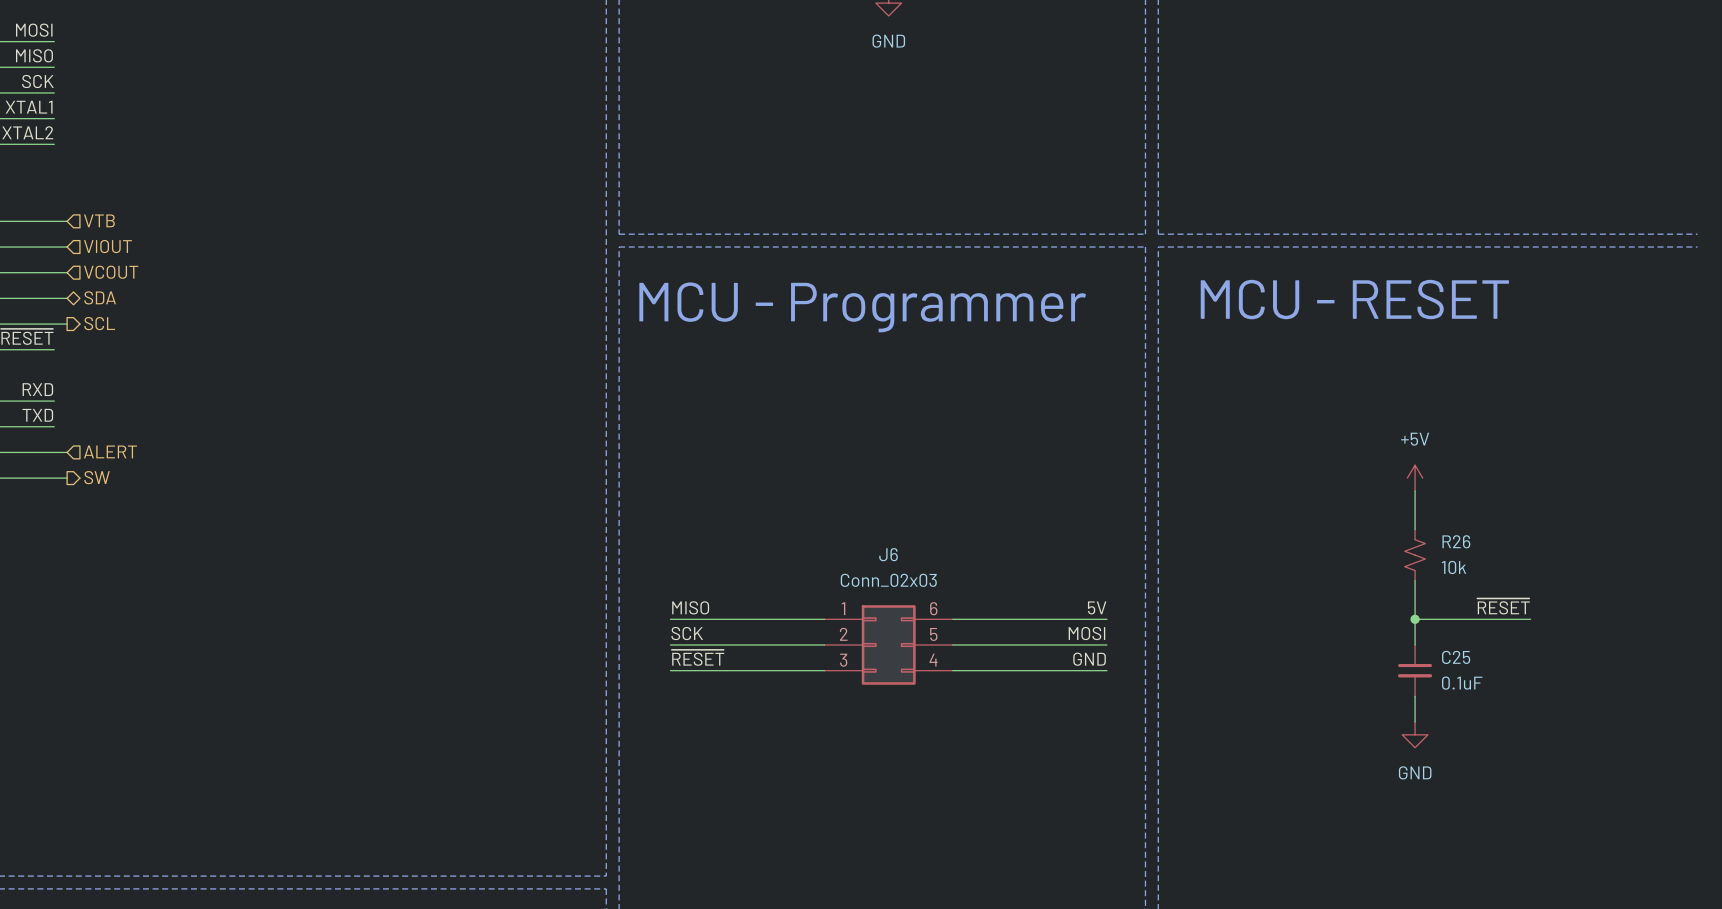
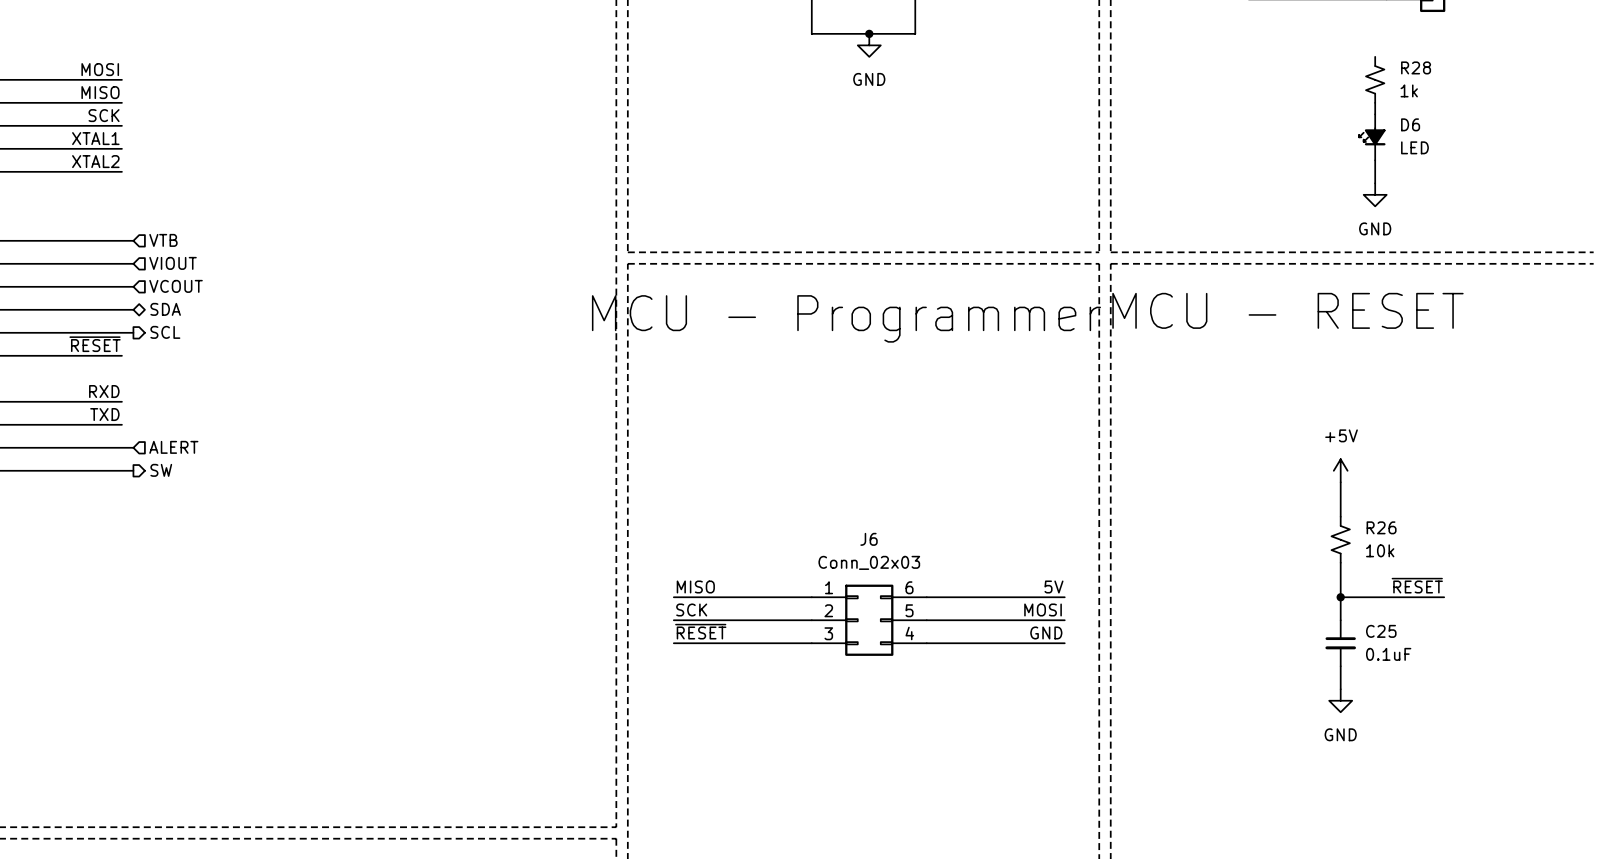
R28: none -> 1k (1375, 79)
wire: none -> (1375, 102) (1375, 114)
D6: none -> LED (1372, 137)
wire: none -> (1375, 160) (1375, 183)
power symbol: none -> GND (1375, 194)

